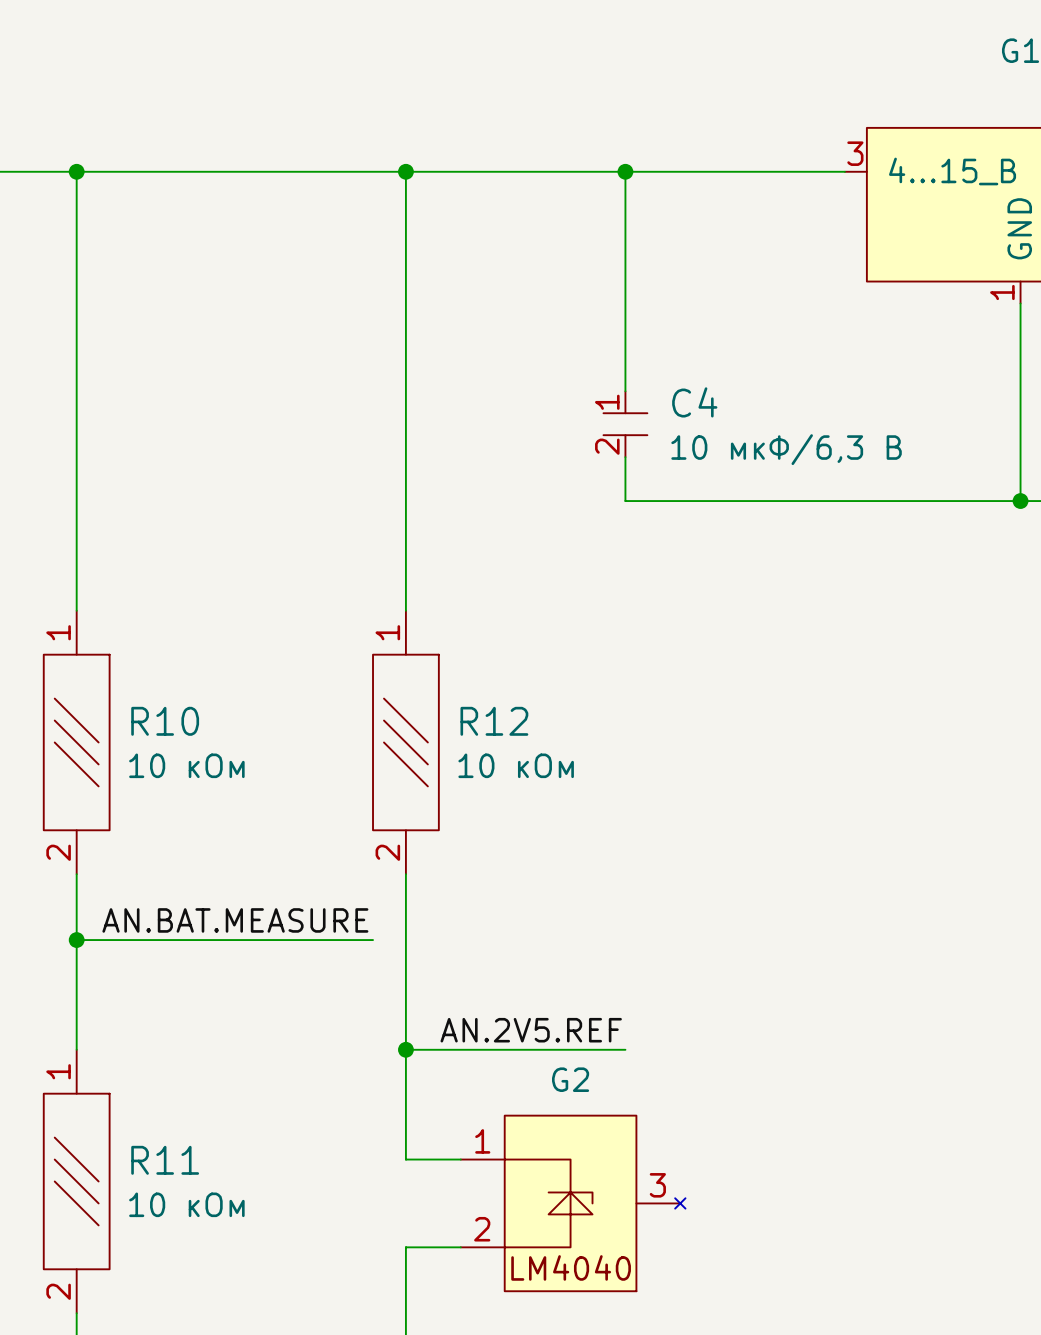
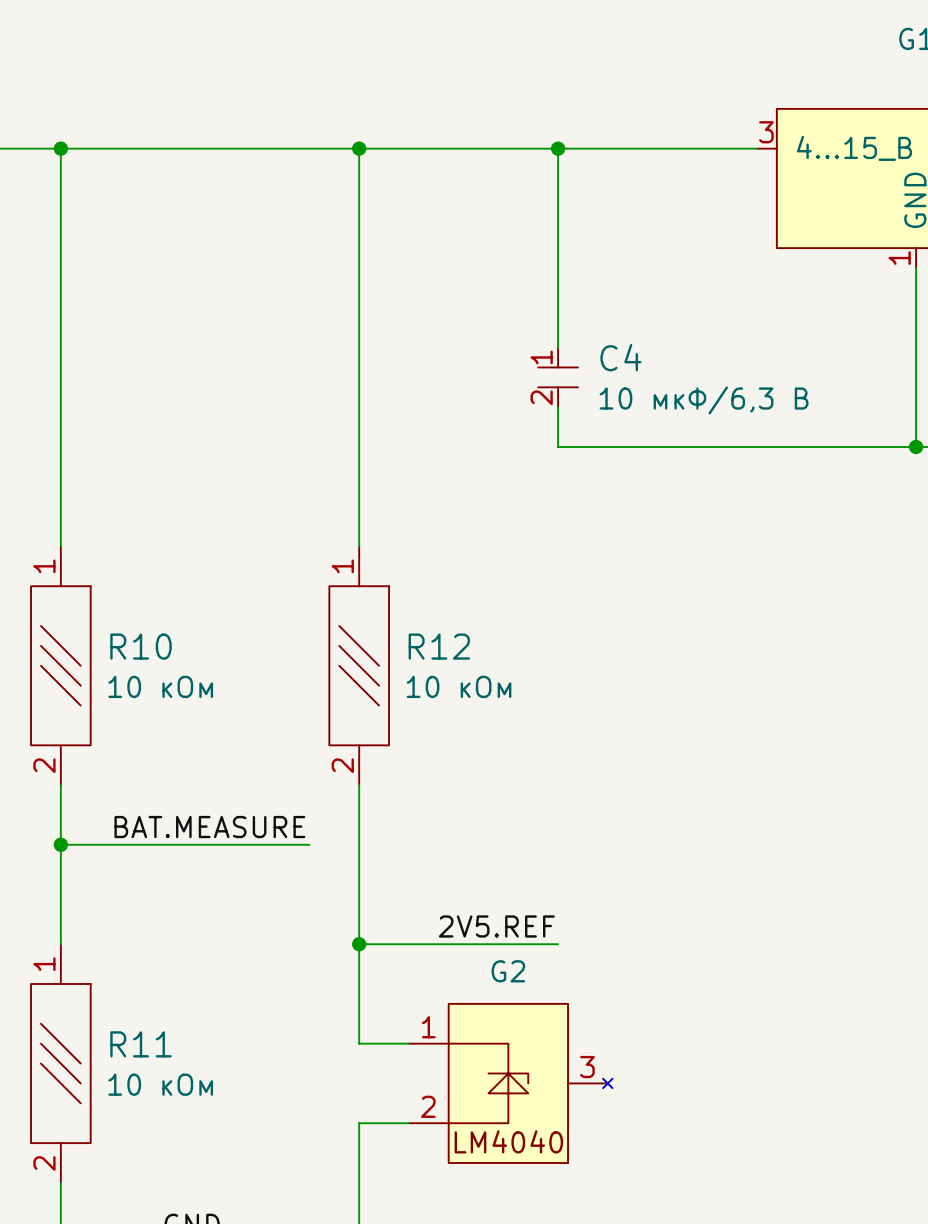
label: AN.BAT.MEASURE (235, 920) -> BAT.MEASURE (209, 827)
wire: (351, 940) (373, 940) -> none
label: AN.2V5.REF (531, 1030) -> 2V5.REF (496, 926)

